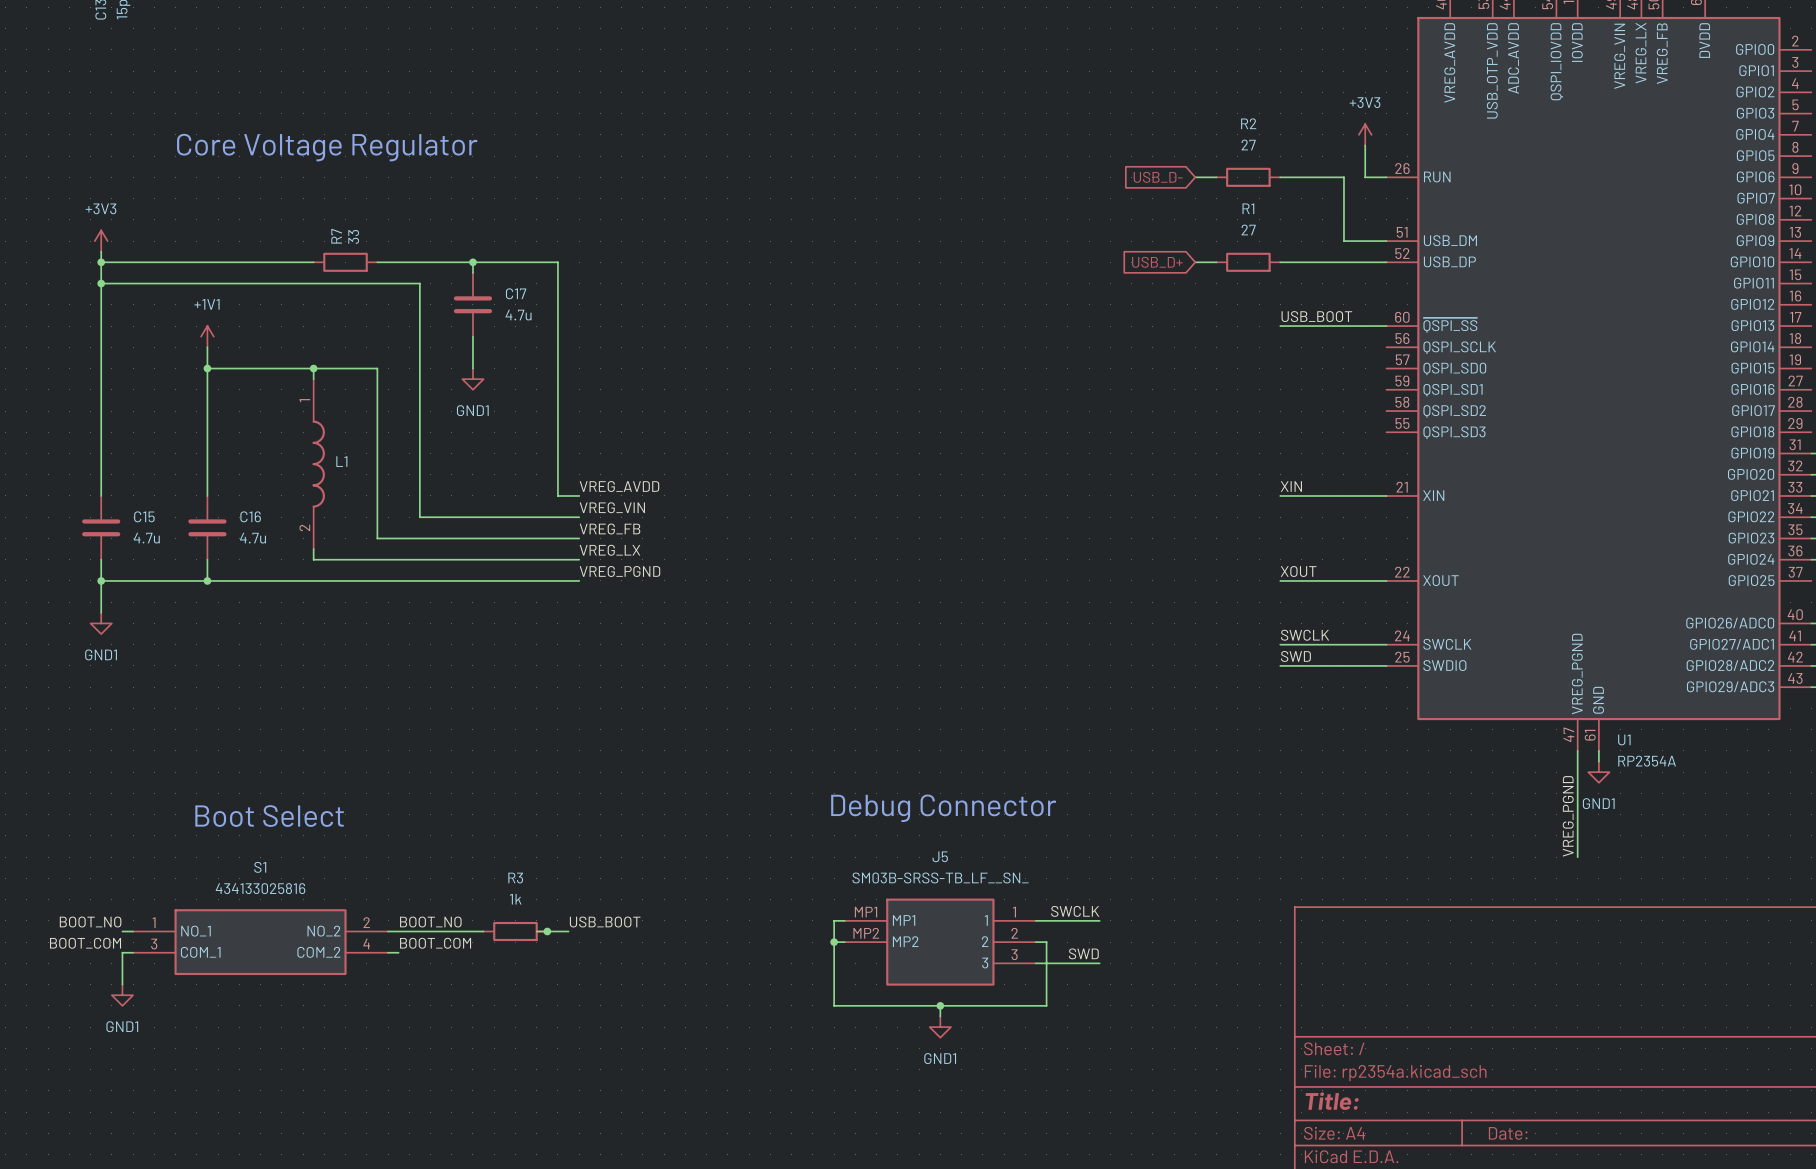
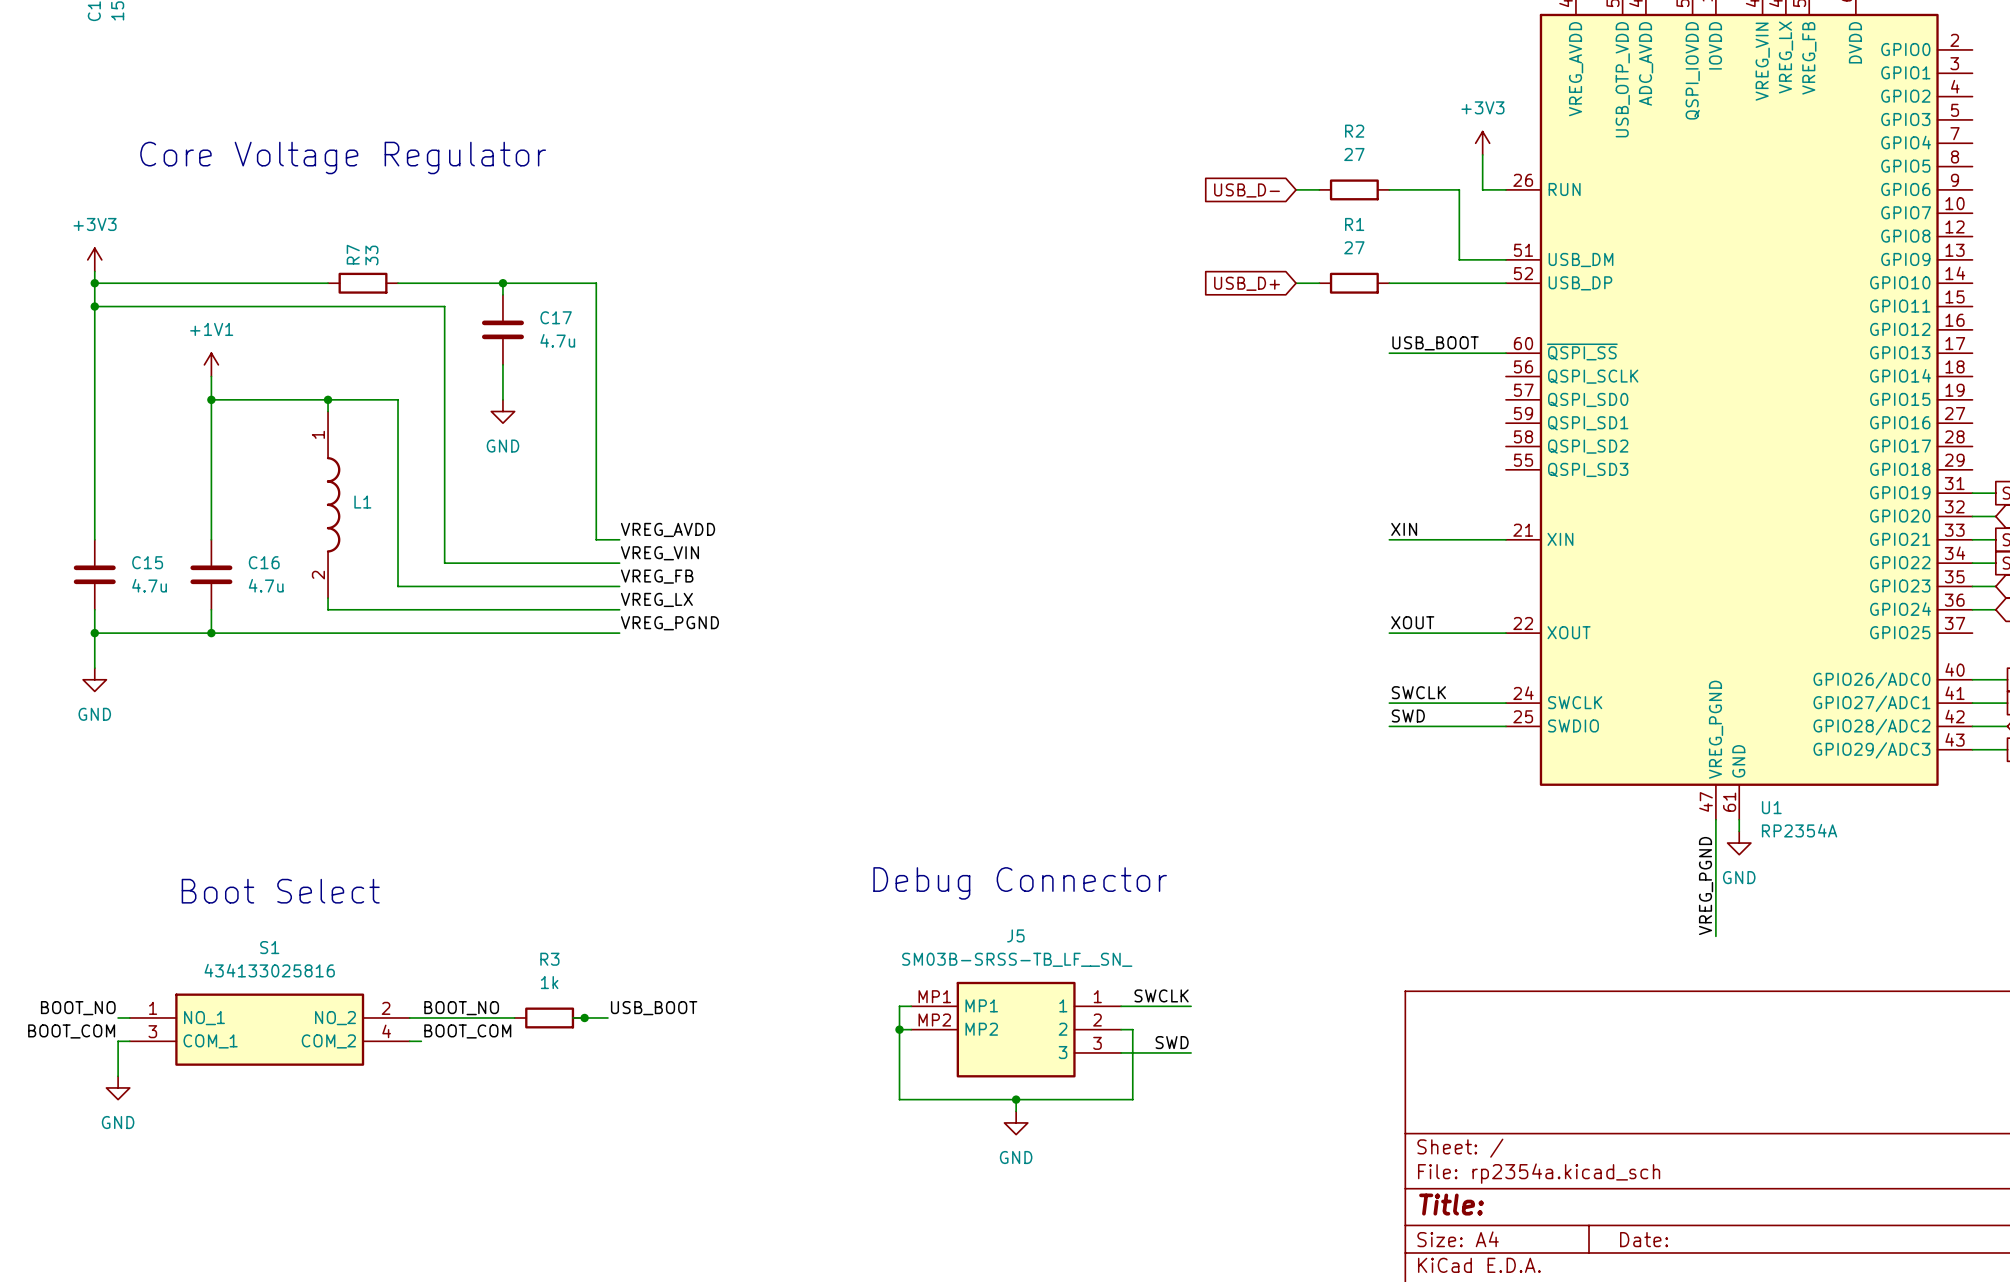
power symbol: GND1 (472, 379) -> GND (502, 411)
power symbol: GND1 (101, 623) -> GND (94, 679)
power symbol: GND1 (1598, 772) -> GND (1739, 843)
power symbol: GND1 (122, 995) -> GND (118, 1087)
power symbol: GND1 (940, 1027) -> GND (1016, 1122)

